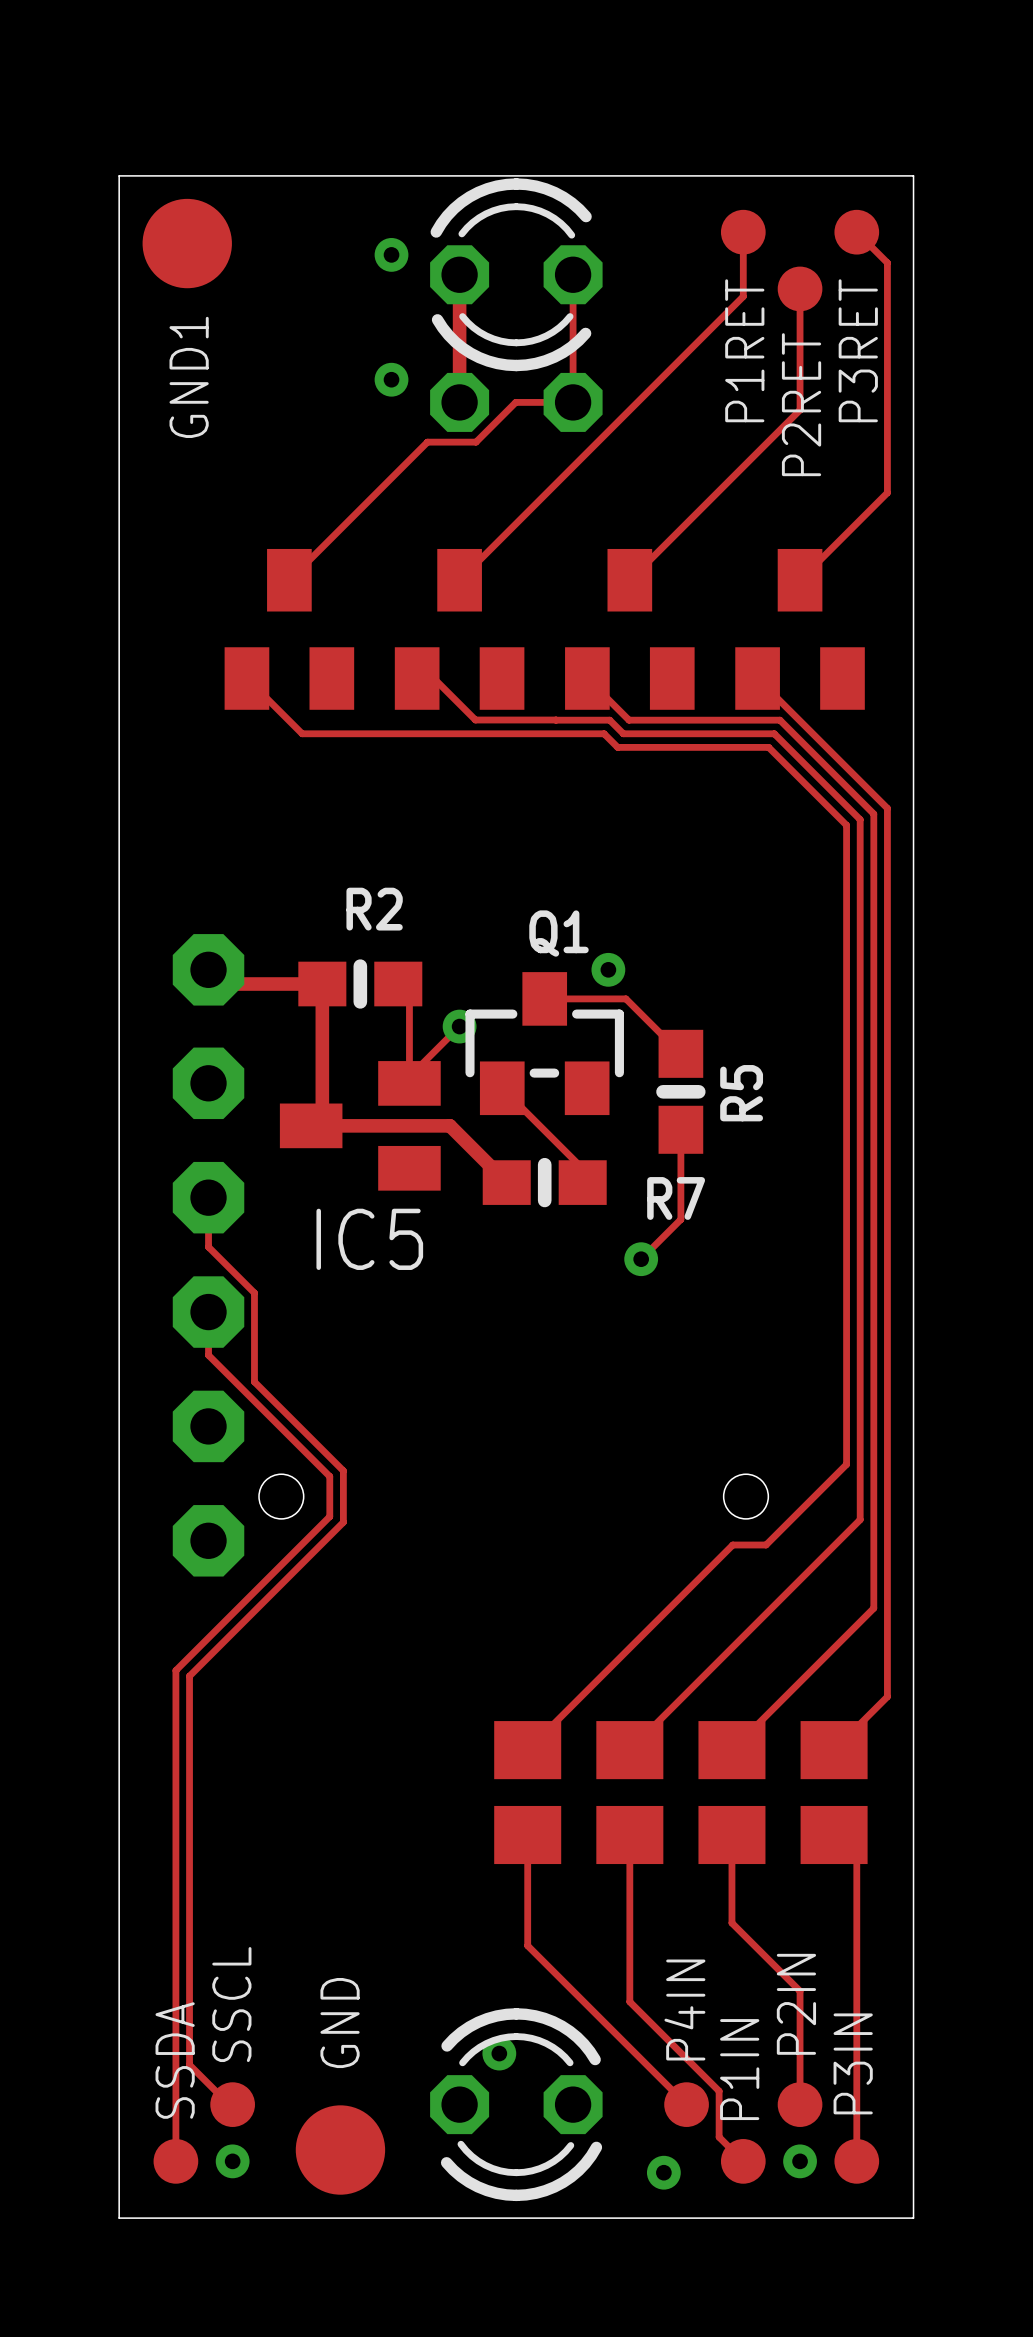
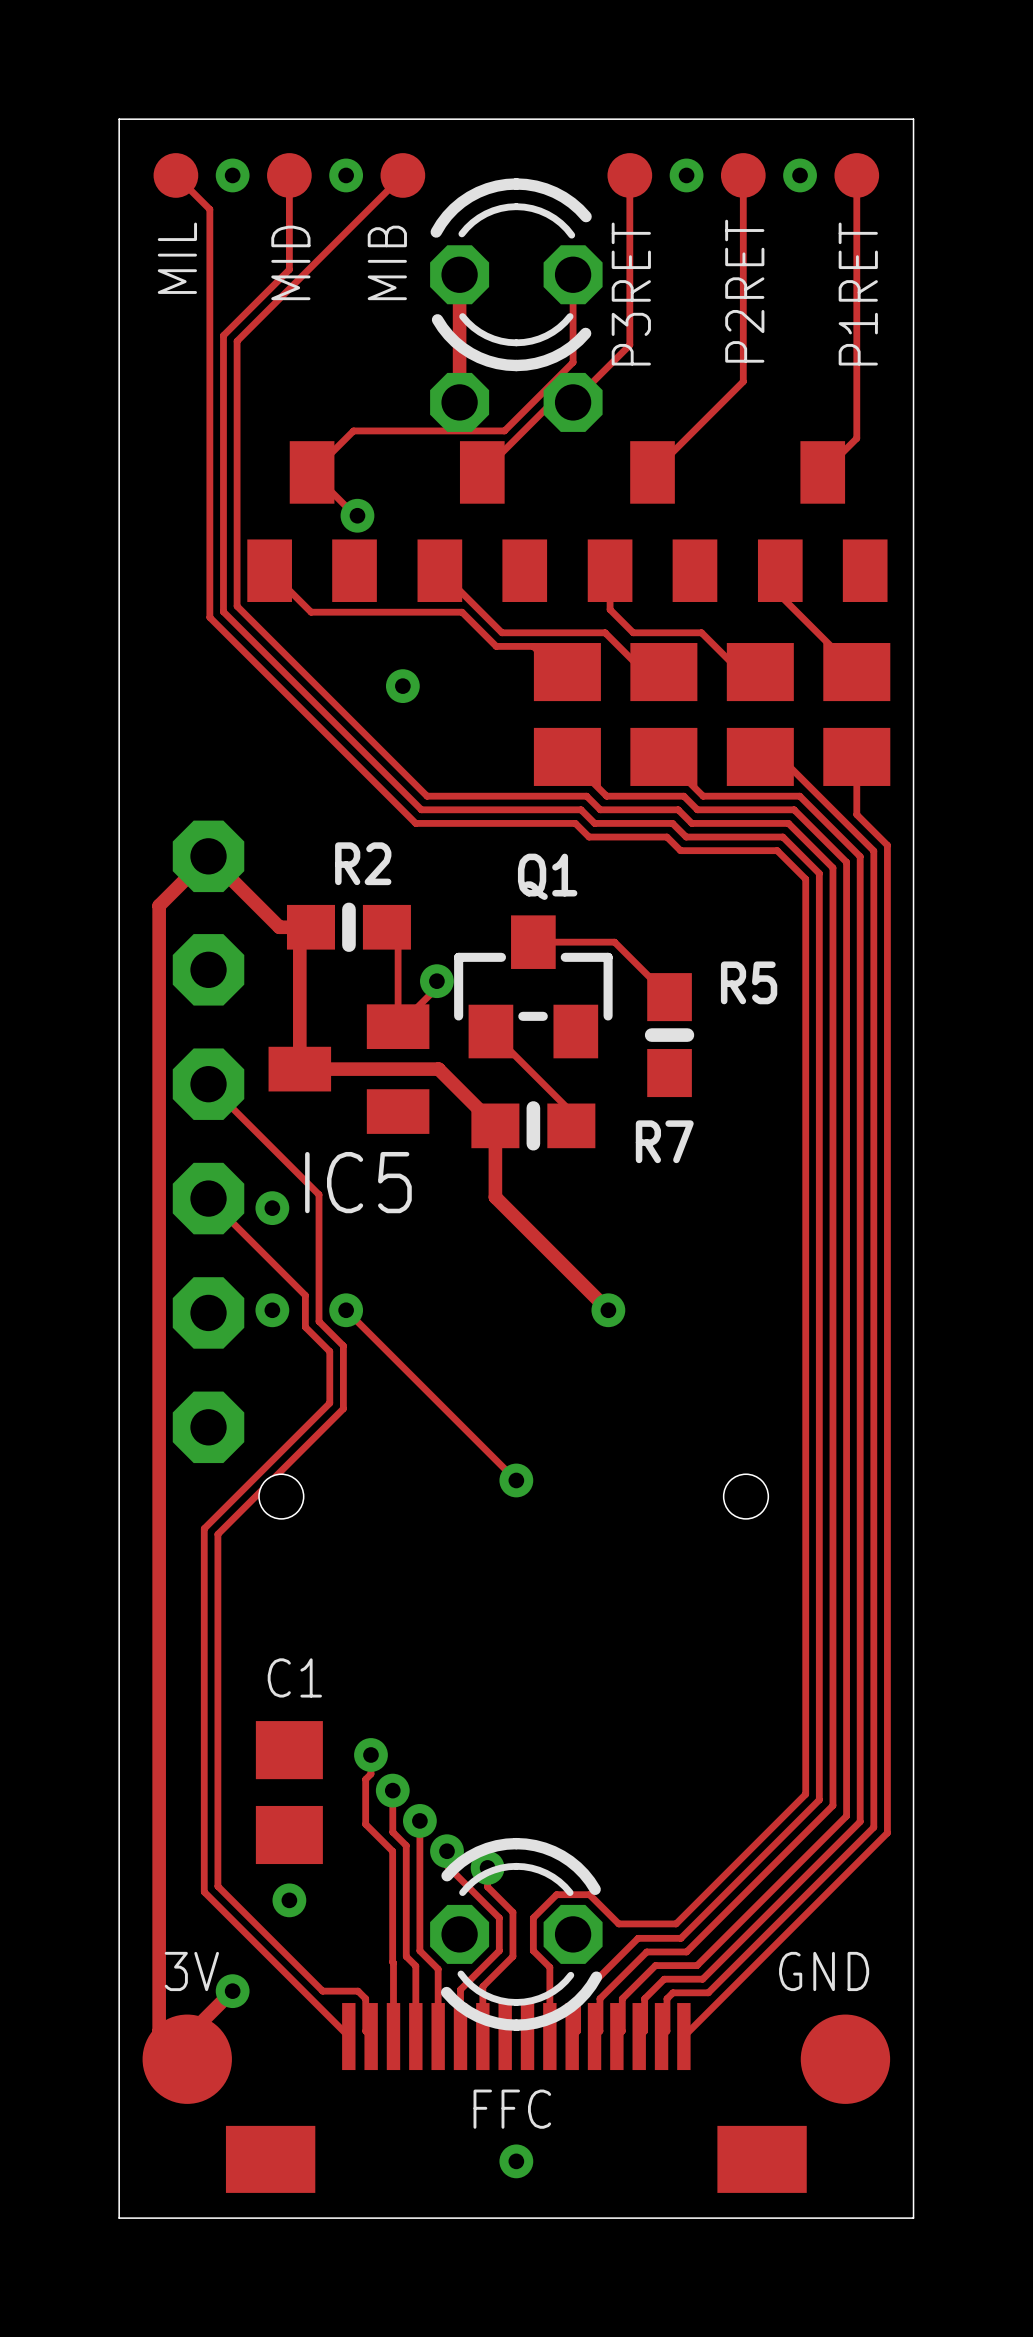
board edge: (119, 175) (913, 175) -> (119, 175) (119, 119) (913, 119) (913, 175)
track: none -> (175, 175) (209, 209) (209, 617) (415, 823) (575, 823) (589, 837) (666, 837) (680, 850) (777, 850) (805, 879) (805, 1794) (676, 1923) (618, 1923) (589, 1894) (556, 1894) (533, 1917) (533, 1950) (549, 1967) (549, 2036)
MIL: none -> (175, 175)
via: none -> (232, 175)
track: none -> (289, 175) (289, 269) (223, 335) (223, 611) (421, 809) (581, 809) (594, 823) (672, 823) (686, 837) (782, 837) (819, 873) (819, 1799) (680, 1938) (638, 1938) (577, 1998) (577, 2031) (572, 2036)
MID: none -> (289, 175)
via: none -> (346, 175)
track: none -> (402, 175) (237, 341) (237, 606) (427, 796) (586, 796) (600, 809) (678, 809) (691, 823) (788, 823) (832, 867) (832, 1805) (686, 1951) (646, 1951) (599, 1998) (599, 2031) (594, 2036)
MIB: none -> (402, 175)
track: none -> (629, 175) (629, 345) (589, 385) (569, 385) (482, 472)
via: none -> (686, 175)
track: none -> (743, 175) (743, 232)
via: none -> (800, 175)
track: none -> (856, 175) (856, 438) (822, 472)
P1RET position: (743, 232) -> (856, 175)
track: (856, 232) (887, 262) (887, 492) (800, 580) -> none
P3RET position: (856, 232) -> (629, 175)
GND1: (187, 243) -> none
via: (391, 254) -> none
track: (800, 288) (800, 410) (629, 580) -> none
P2RET position: (800, 288) -> (743, 175)
track: (743, 296) (459, 580) -> (743, 296) (743, 381) (652, 472)
track: (573, 362) (573, 402) (515, 402) (476, 442) (427, 442) (289, 580) -> (573, 362) (504, 430) (353, 430) (312, 472) (357, 515)
via: (391, 379) -> none
via: none -> (357, 515)
part: none -> (312, 521)
part: none -> (482, 521)
part: none -> (652, 521)
part: none -> (822, 521)
track: none -> (269, 570) (311, 612) (462, 612) (496, 646) (533, 646) (559, 672) (567, 672)
track: none -> (439, 570) (501, 632) (605, 632) (644, 672) (663, 672)
track: none -> (610, 570) (610, 609) (633, 632) (701, 632) (740, 672) (760, 672)
track: none -> (780, 570) (780, 595) (856, 672)
part: (289, 629) -> none
part: (459, 629) -> none
part: (629, 629) -> none
part: (800, 629) -> none
track: (246, 678) (302, 733) (604, 733) (617, 747) (768, 747) (846, 825) (846, 862) -> (567, 756) (606, 796) (683, 796) (697, 809) (794, 809) (846, 862)
track: (417, 678) (433, 678) (475, 720) (609, 720) (623, 733) (774, 733) (860, 819) (860, 856) -> (663, 756) (703, 796) (799, 796) (860, 856)
track: (587, 678) (629, 720) (779, 720) (873, 813) (873, 850) -> (760, 756) (779, 756) (873, 850)
track: (757, 678) (887, 808) (887, 845) -> (856, 756) (856, 814) (887, 845)
via: none -> (402, 686)
part: none -> (567, 714)
part: none -> (663, 714)
part: none -> (760, 714)
part: none -> (856, 714)
R2 name position: R2 (374, 909) -> R2 (363, 863)
track: none -> (386, 927) (398, 938) (398, 1026) (436, 987) (436, 981)
track: (208, 969) (222, 984) (322, 984) (322, 1114) (311, 1125) (450, 1125) (506, 1182) -> none
via: (608, 969) -> none
R2 position: (360, 984) -> (348, 927)
track: (398, 984) (409, 995) (409, 1083) -> none
track: (544, 998) (625, 998) (680, 1053) -> (533, 942) (614, 942) (669, 997)
track: (459, 1026) (409, 1076) -> none
via position: (459, 1026) -> (436, 981)
Q1 position: (544, 1043) -> (533, 986)
track: none -> (208, 1084) (319, 1194) (319, 1321) (343, 1345) (343, 1408) (217, 1534) (217, 1886) (322, 1991) (358, 1991) (365, 1998) (365, 2031) (371, 2036)
track: (502, 1088) (582, 1168) (582, 1182) -> (490, 1031) (571, 1111) (571, 1125)
R5 position: (680, 1091) -> (669, 1035)
R5 name rotation: 0° (741, 1093) -> 90° clockwise (749, 982)
IC5 position: (360, 1125) -> (348, 1069)
track: (680, 1129) (680, 1219) (641, 1259) -> none
R7 position: (544, 1182) -> (533, 1125)
track: (208, 1197) (208, 1247) (254, 1293) (254, 1381) (343, 1470) (343, 1522) (189, 1676) (189, 2064) (229, 2104) (232, 2104) -> (208, 1198) (305, 1295) (305, 1327) (329, 1351) (329, 1403) (204, 1528) (204, 1892) (348, 2036)
via: none -> (272, 1208)
part position: (208, 1255) -> (208, 1141)
via position: (641, 1259) -> (608, 1310)
via: none -> (272, 1310)
track: none -> (346, 1310) (516, 1480)
via: none -> (346, 1310)
track: none -> (608, 1310) (495, 1197) (495, 1125) (438, 1069) (299, 1069) (299, 938) (310, 927) (279, 927) (208, 856) (159, 905) (159, 2031) (187, 2059) (187, 2036) (232, 1991)
track: (208, 1312) (208, 1355) (329, 1476) (329, 1516) (175, 1670) (175, 2161) -> none
track: (846, 1464) (766, 1545) (732, 1545) (527, 1750) -> (846, 1464) (846, 1816) (697, 1965) (655, 1965) (622, 1998) (622, 2031) (616, 2036)
via: none -> (516, 1480)
track: (860, 1519) (629, 1750) -> (860, 1519) (860, 1821) (702, 1979) (664, 1979) (644, 1998) (644, 2031) (639, 2036)
track: (873, 1608) (731, 1750) -> (873, 1608) (873, 1827) (708, 1992) (672, 1992) (666, 1998) (666, 2031) (661, 2036)
track: (887, 1696) (834, 1750) -> (887, 1696) (887, 1832) (683, 2036)
track: none -> (370, 1754) (370, 1774) (365, 1779) (365, 1824) (392, 1851) (393, 2036)
via: none -> (370, 1754)
track: none -> (392, 1790) (392, 1832) (406, 1845) (406, 1956) (415, 1966) (415, 2036)
via: none -> (392, 1790)
C1: none -> (289, 1792)
part: (527, 1792) -> none
part: (629, 1792) -> none
part: (731, 1792) -> none
part: (834, 1792) -> none
track: none -> (419, 1820) (419, 1950) (438, 1969) (438, 2036)
via: none -> (419, 1820)
track: (527, 1835) (527, 1945) (686, 2104) -> none
track: (629, 1835) (629, 2001) (719, 2091) (719, 2137) (743, 2161) -> none
track: (731, 1835) (731, 1923) (800, 1991) (800, 2104) -> none
track: (834, 1835) (856, 1857) (856, 2161) -> none
track: none -> (447, 1851) (447, 1865) (499, 1917) (499, 1950) (460, 1989) (460, 2036)
via: none -> (447, 1851)
track: none -> (487, 1867) (487, 1886) (512, 1912) (512, 1956) (482, 1986) (482, 2036)
via: none -> (487, 1867)
via: none -> (289, 1900)
part: none -> (516, 1934)
via: none -> (232, 1991)
part footprint: [430, 2008, 603, 2202] -> [225, 2003, 807, 2193]
GND name rotation: 0° (340, 2023) -> 90° clockwise (824, 1971)
via: (499, 2053) -> none
3V: none -> (187, 2059)
SSCL: (232, 2104) -> none
P4IN: (686, 2104) -> none
P2IN: (800, 2104) -> none
text: none -> FFC (512, 2109)
GND position: (340, 2150) -> (845, 2059)
SSDA: (175, 2161) -> none
via: (232, 2161) -> none
via: none -> (516, 2161)
P1IN: (743, 2161) -> none
via: (800, 2161) -> none
P3IN: (856, 2161) -> none
via: (663, 2172) -> none

